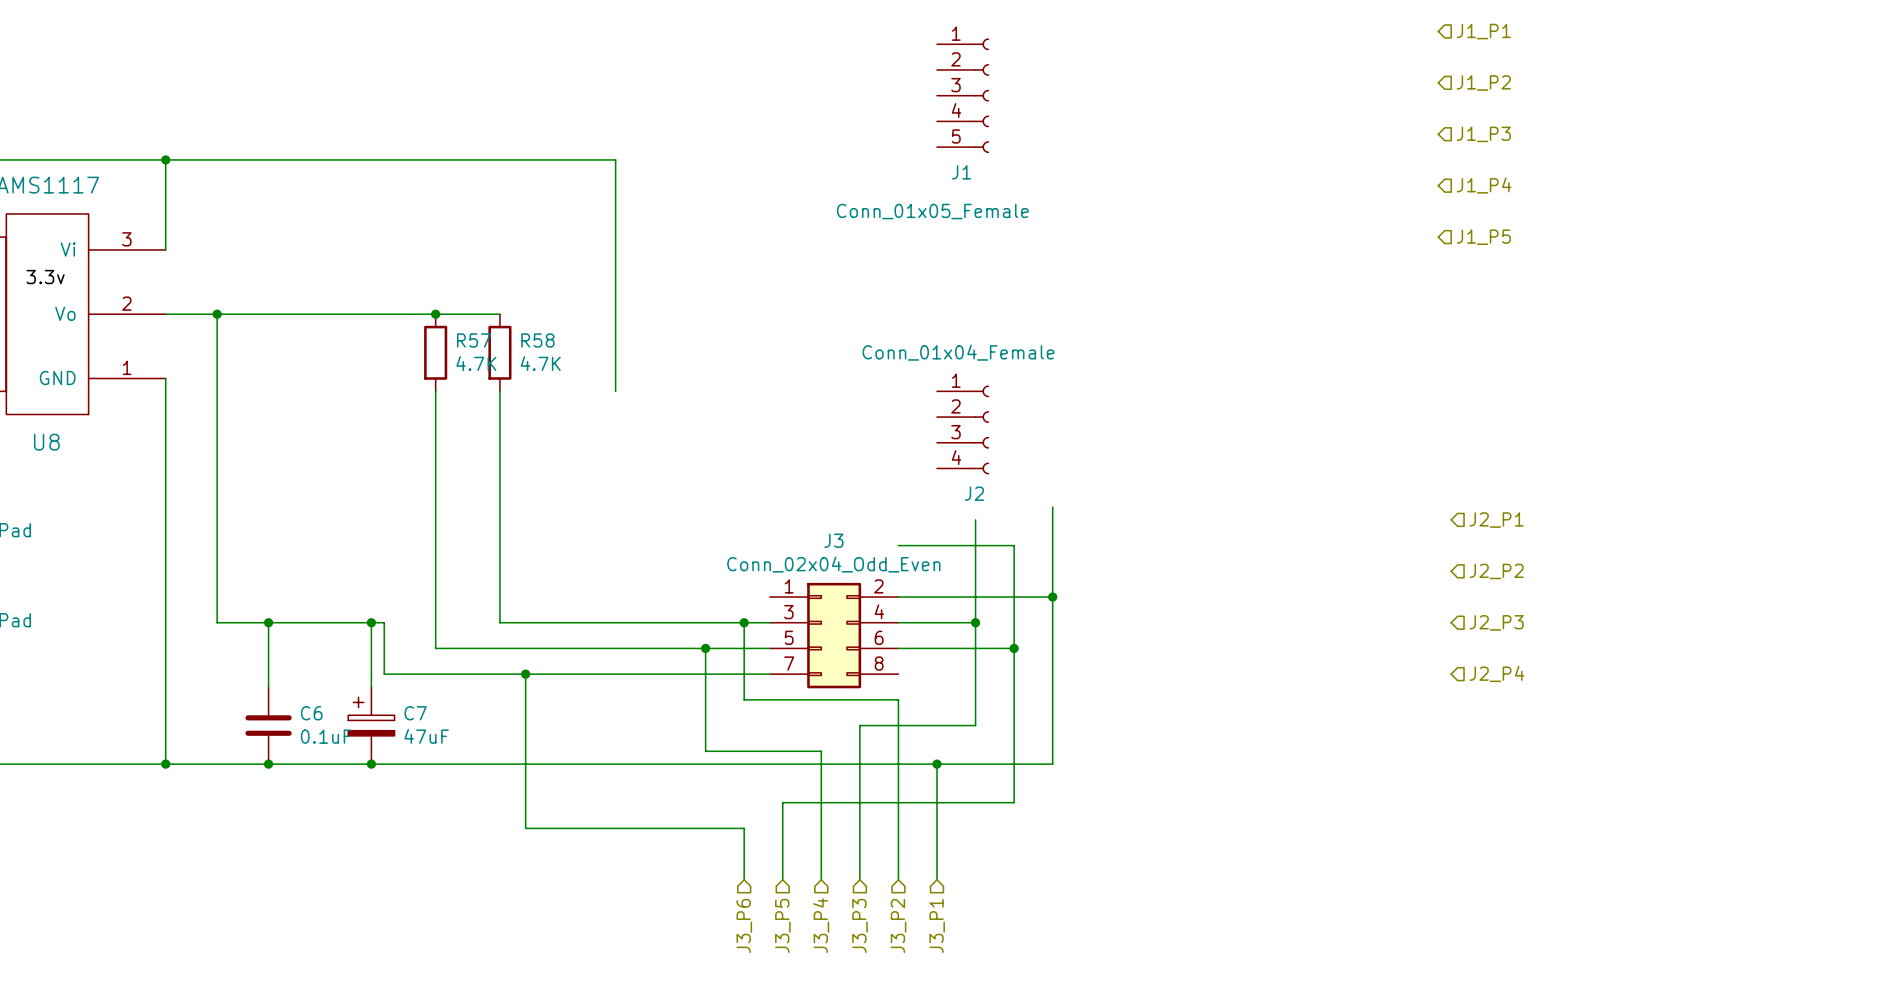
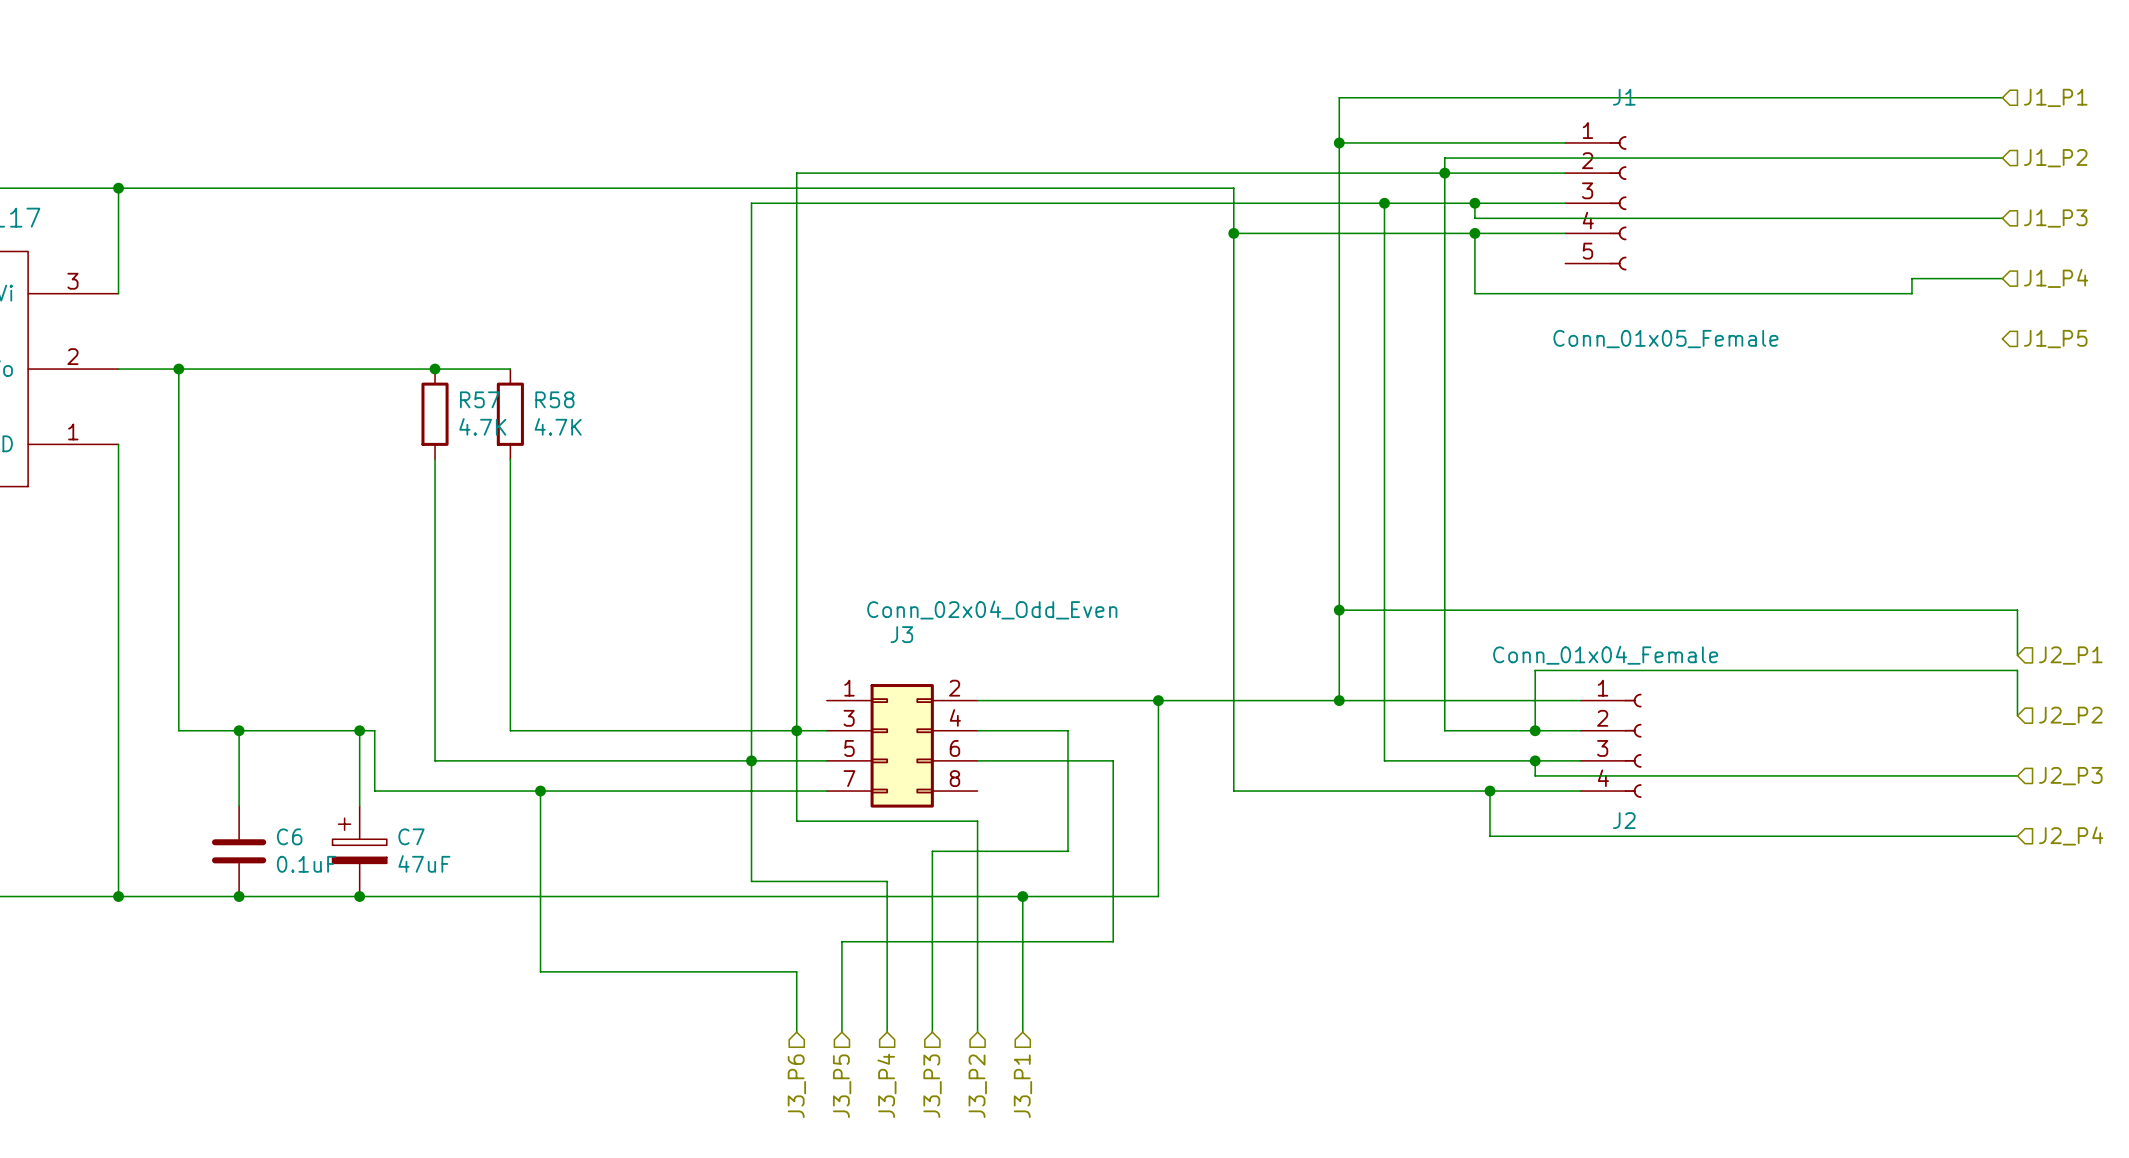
hierarchical label: J1_P1 (1483, 31) -> none
hierarchical label: J1_P2 (1483, 82) -> none
wire: none -> (2002, 97) (1339, 97) (1339, 700)
hierarchical label: none -> J1_P1 (2055, 97)
J1 position: (963, 95) -> (1595, 203)
wire: none -> (1339, 142) (1565, 142)
junction: none -> (1339, 142)
hierarchical label: J1_P3 (1483, 134) -> none
wire: none -> (2002, 158) (1444, 158) (1444, 730) (1580, 730)
hierarchical label: none -> J1_P2 (2055, 158)
junction: none -> (1444, 173)
wire: none -> (1565, 173) (796, 173) (796, 730)
wire: (615, 159) (615, 391) -> (646, 188) (1233, 188) (1233, 791) (1580, 791)
J1 name position: J1 (961, 172) -> J1 (1624, 97)
wire: none -> (1384, 203) (1384, 760) (1580, 760)
junction: none -> (1384, 203)
wire: none -> (1474, 203) (1474, 218) (2002, 218)
junction: none -> (1474, 203)
wire: none -> (1565, 203) (751, 203) (751, 760)
hierarchical label: J1_P4 (1484, 185) -> none
hierarchical label: none -> J1_P3 (2055, 218)
wire: none -> (1233, 233) (1565, 233)
junction: none -> (1233, 233)
wire: none -> (1474, 233) (1474, 293) (1911, 293) (1911, 278) (2002, 278)
junction: none -> (1474, 233)
J1 value position: Conn_01x05_Female (932, 211) -> Conn_01x05_Female (1665, 339)
hierarchical label: none -> J1_P4 (2056, 278)
hierarchical label: J1_P5 (1483, 237) -> none
hierarchical label: none -> J1_P5 (2055, 339)
J2 position: (963, 429) -> (1611, 745)
wire: (1052, 507) (1052, 597) -> (1580, 700) (1158, 700)
wire: (975, 519) (975, 622) -> none
wire: none -> (1339, 610) (2017, 610) (2017, 655)
junction: none -> (1339, 610)
hierarchical label: J2_P1 (1496, 520) -> none
wire: (898, 545) (1014, 545) (1014, 648) -> none
hierarchical label: none -> J2_P1 (2070, 655)
J3 value position: Conn_02x04_Odd_Even (833, 564) -> Conn_02x04_Odd_Even (992, 609)
hierarchical label: J2_P2 (1496, 571) -> none
junction: none -> (1339, 700)
wire: none -> (2017, 715) (2017, 670) (1535, 670) (1535, 730)
hierarchical label: none -> J2_P2 (2070, 715)
junction: (975, 622) -> none
junction: none -> (1535, 730)
hierarchical label: J2_P3 (1496, 622) -> none
junction: (1014, 648) -> none
wire: none -> (1535, 760) (1535, 775) (2017, 775)
junction: none -> (1535, 760)
hierarchical label: none -> J2_P3 (2070, 776)
hierarchical label: J2_P4 (1496, 673) -> none
wire: none -> (1489, 791) (1489, 836) (2017, 836)
junction: none -> (1489, 791)
hierarchical label: none -> J2_P4 (2071, 836)

